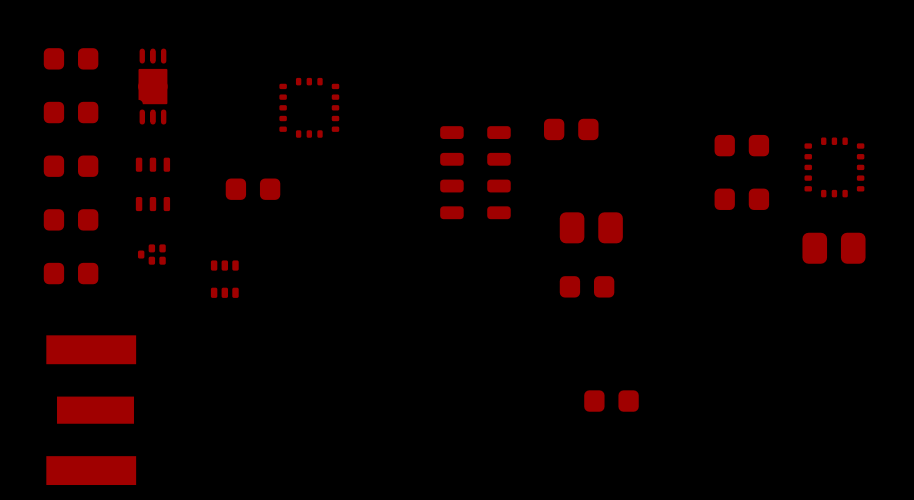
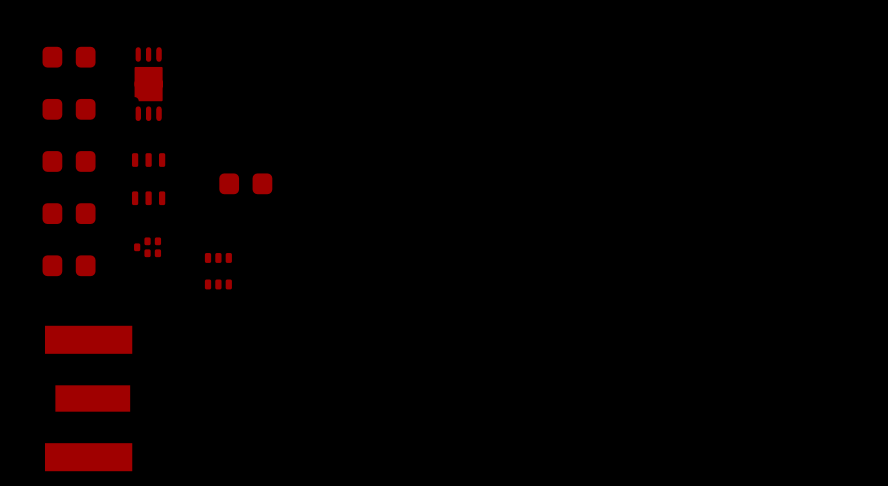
part: (309, 107) -> none
part: (571, 129) -> none
part: (741, 145) -> none
part: (834, 167) -> none
part: (475, 172) -> none
part: (741, 199) -> none
part: (591, 227) -> none
part: (833, 248) -> none
part: (587, 286) -> none
part: (611, 401) -> none

